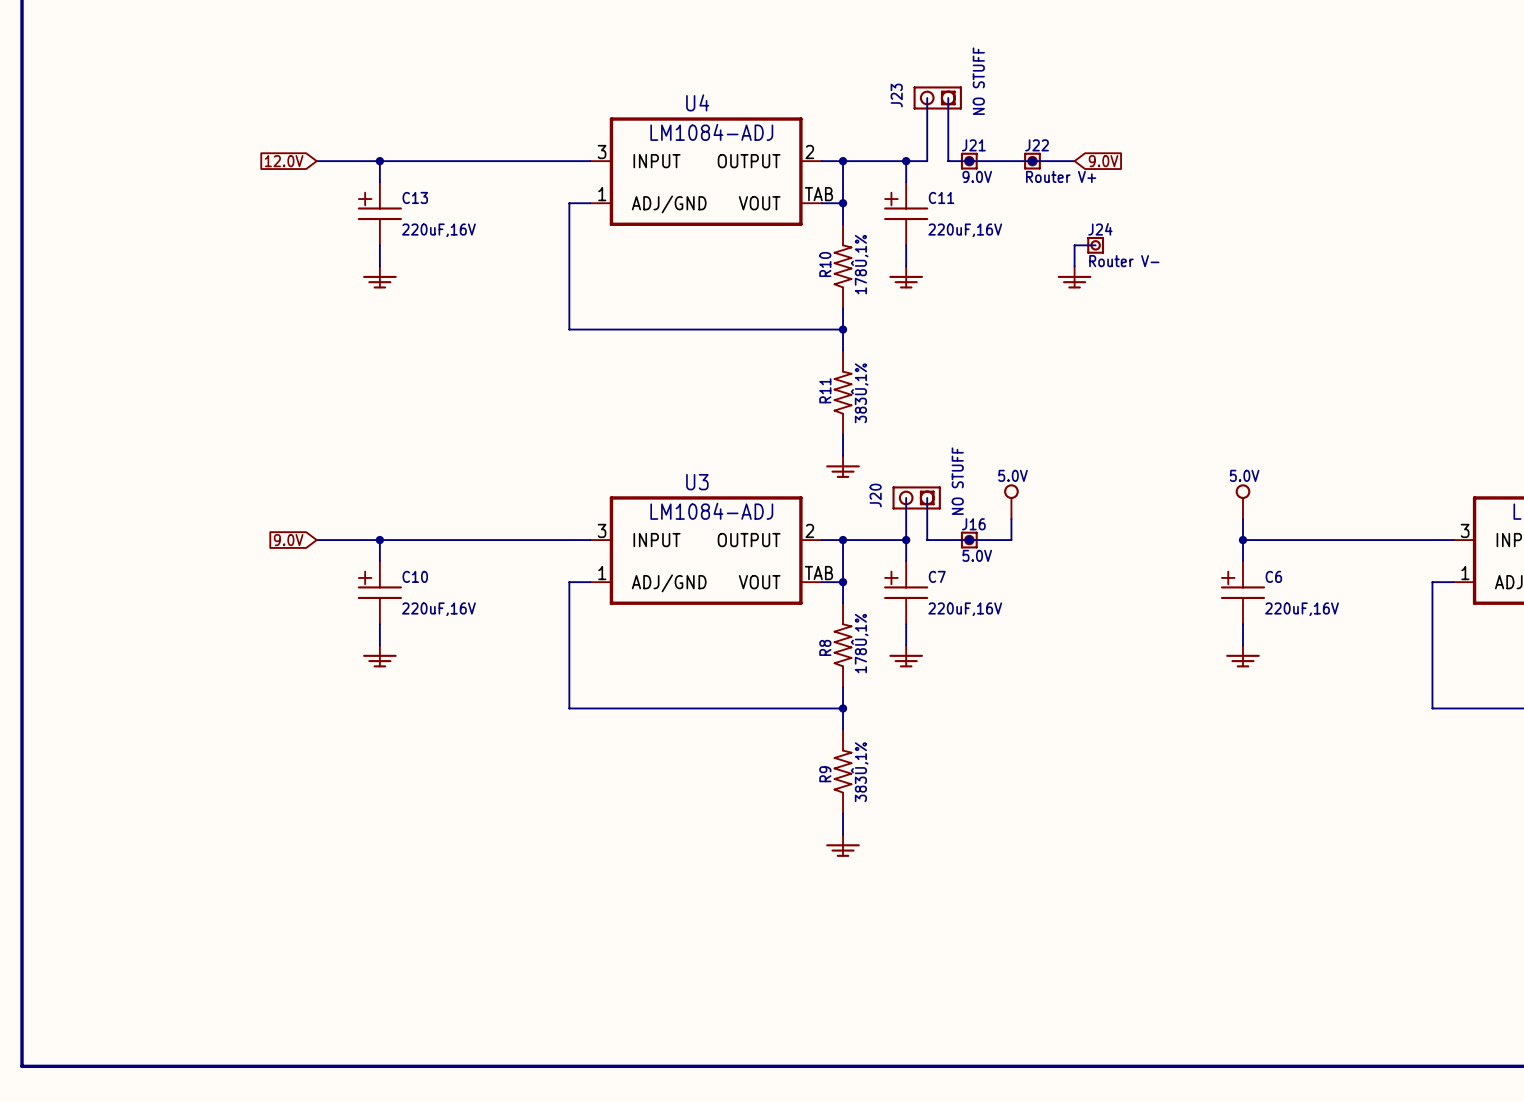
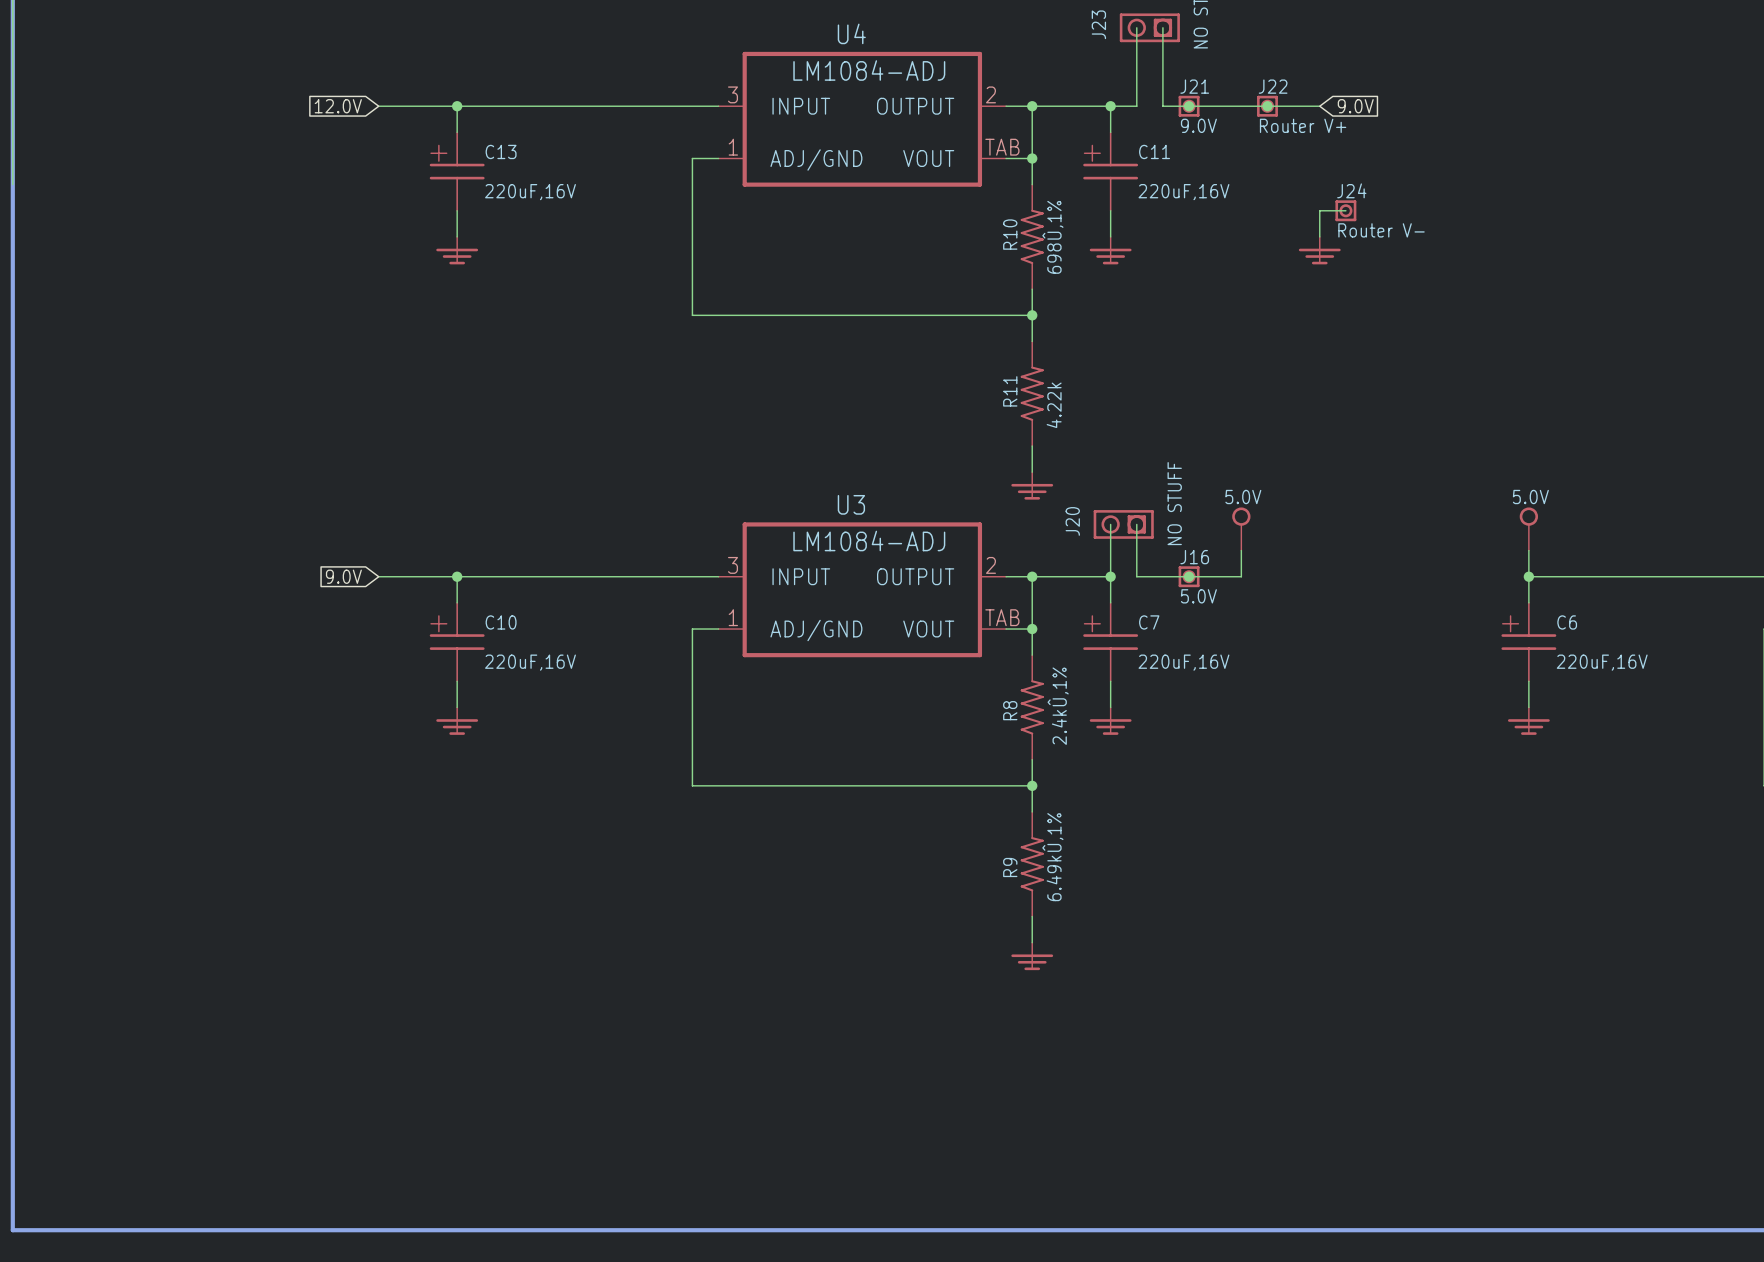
R10 text: 178Û,1% (859, 264) -> none
R10 text: none -> 698Û,1% (1052, 237)
R11 text: 383Û,1% (859, 393) -> none
R11 text: none -> 4.22k (1054, 405)
R8 text: 178Û,1% (859, 643) -> none
R8 text: none -> 2.4kÛ,1% (1058, 706)
R9 text: 383Û,1% (859, 772) -> 6.49kÛ,1% (1052, 857)

